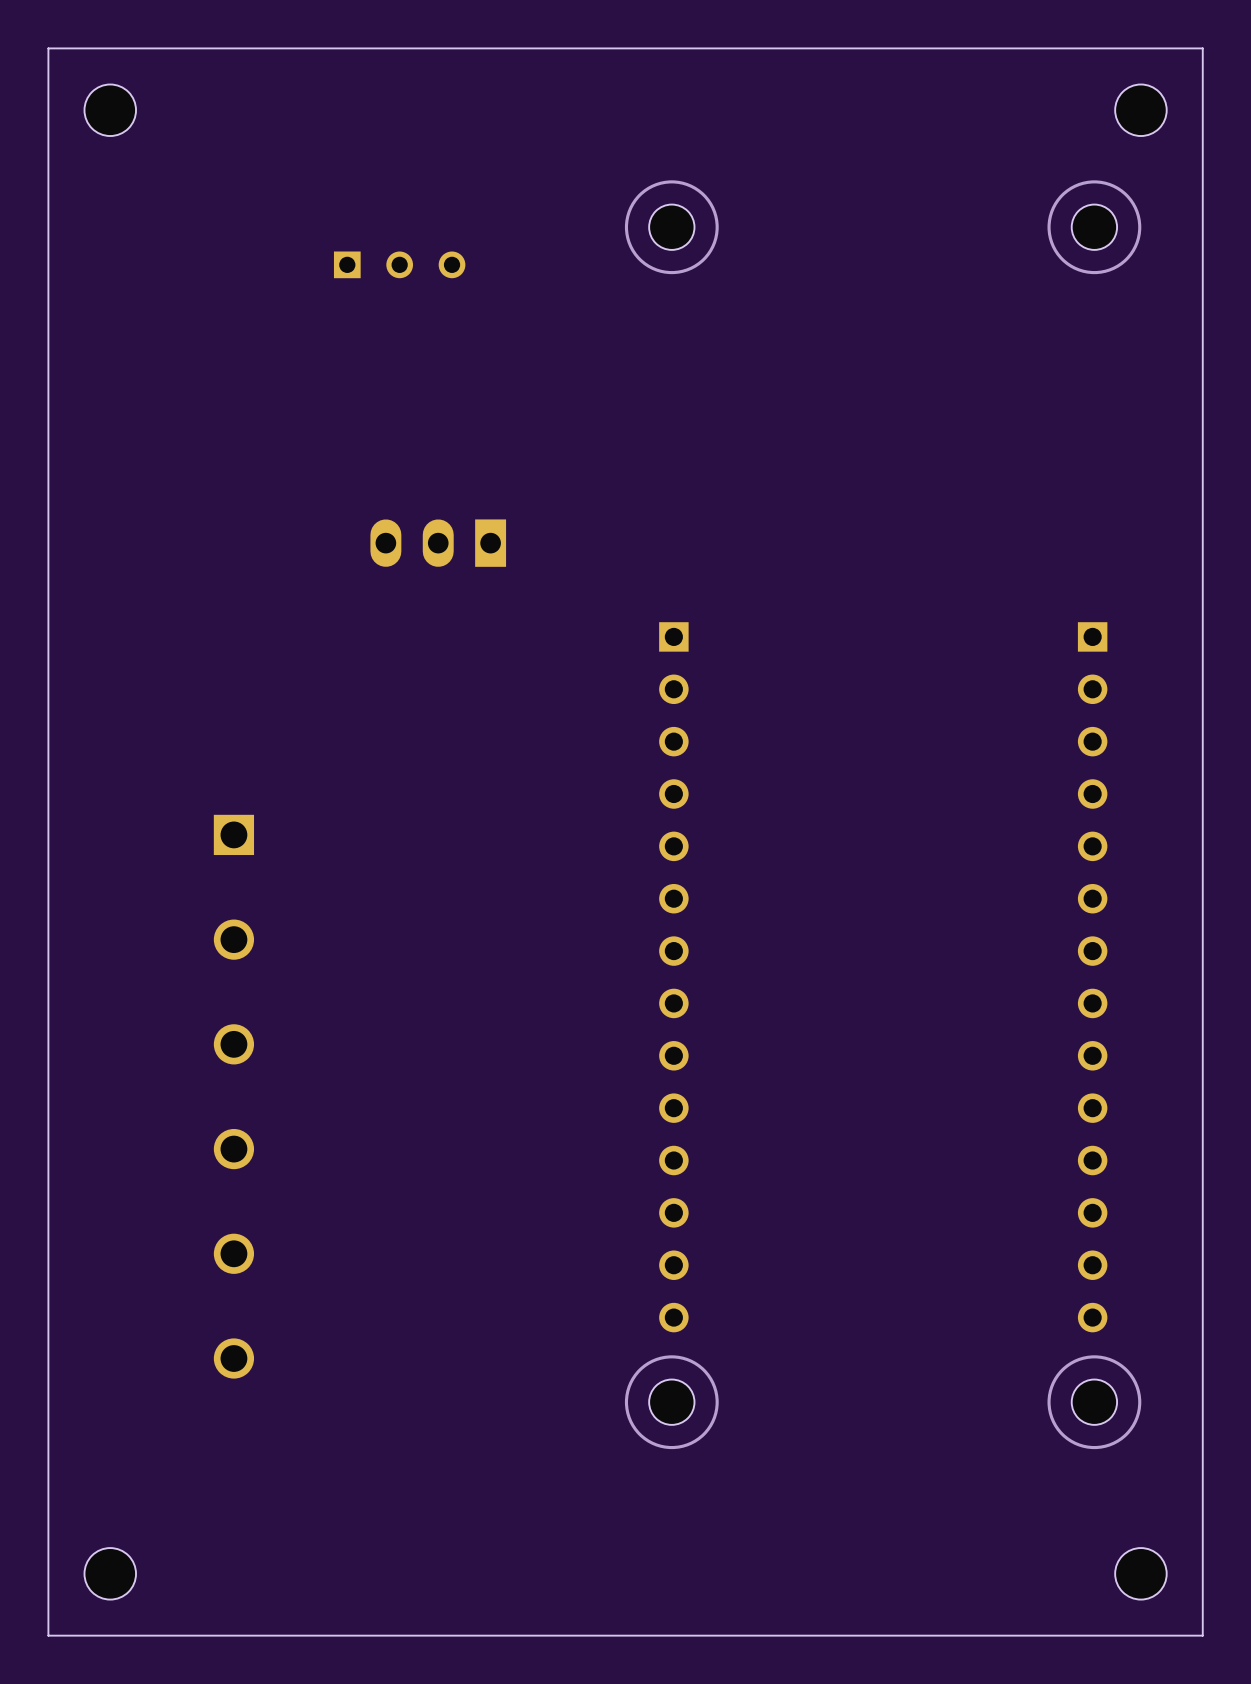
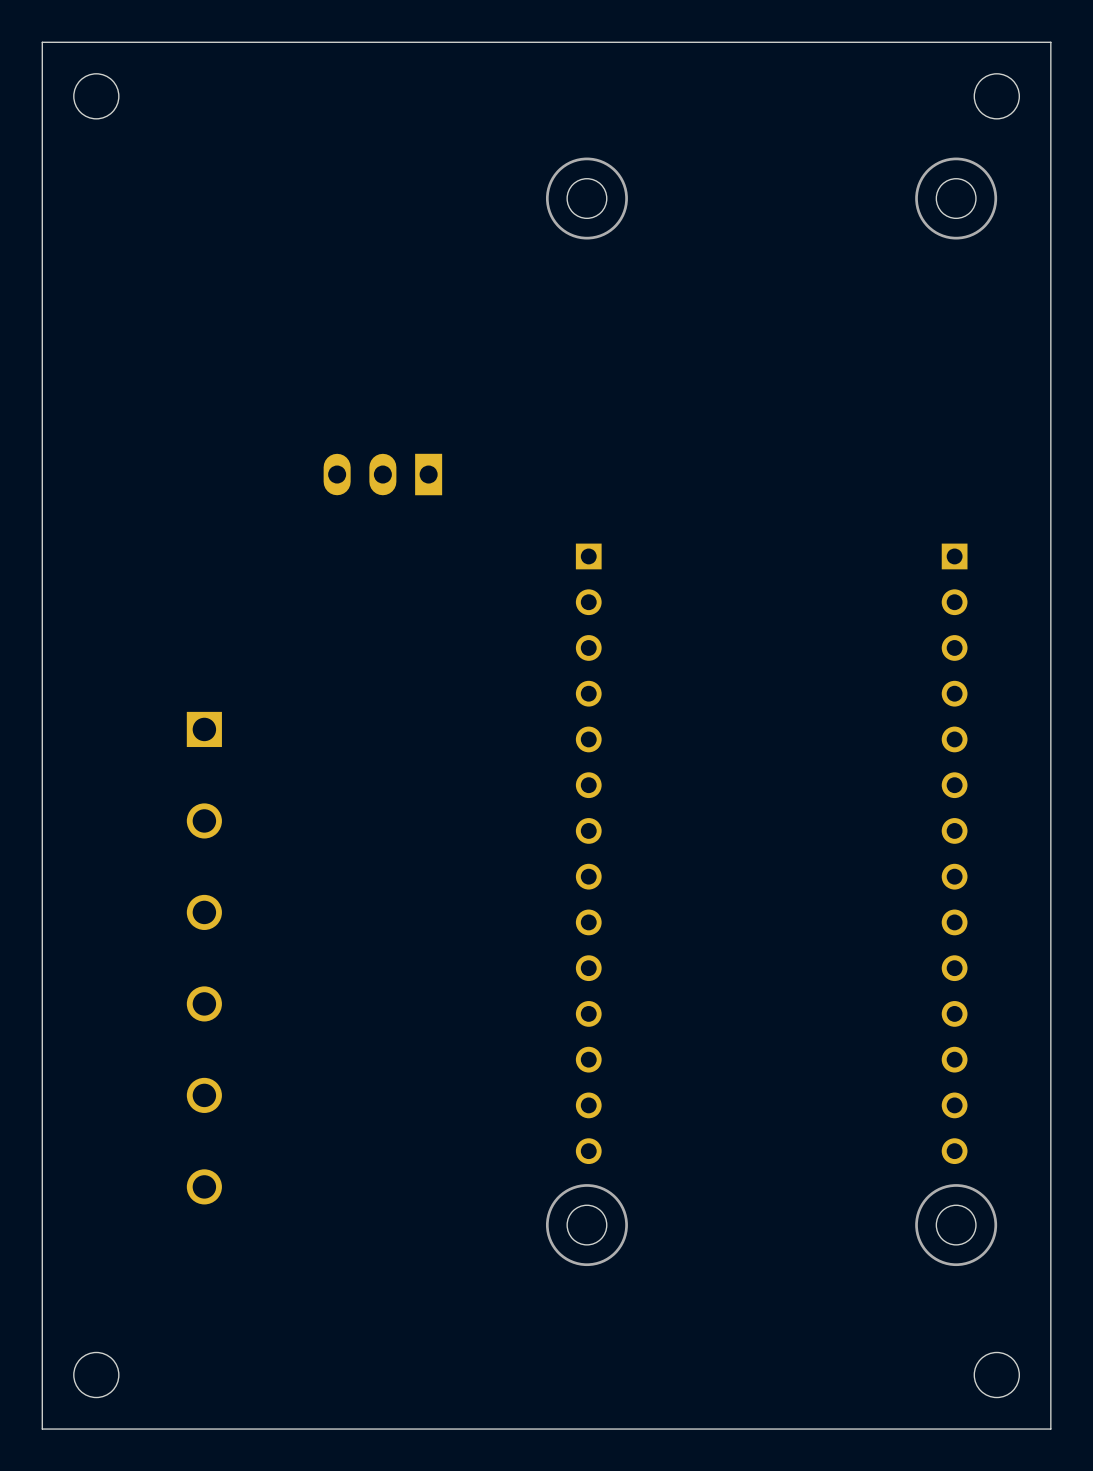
part: (399, 264) -> none

